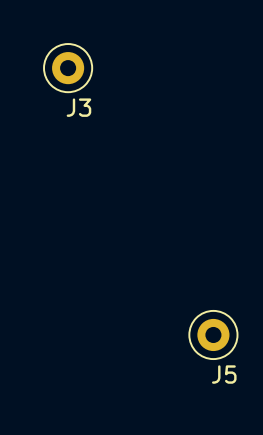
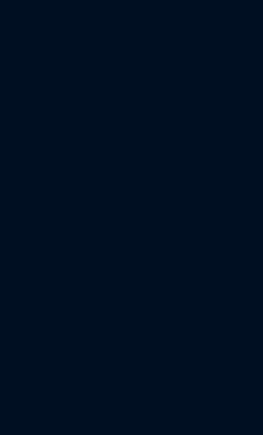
J3: (68, 68) -> none
J5: (213, 334) -> none

